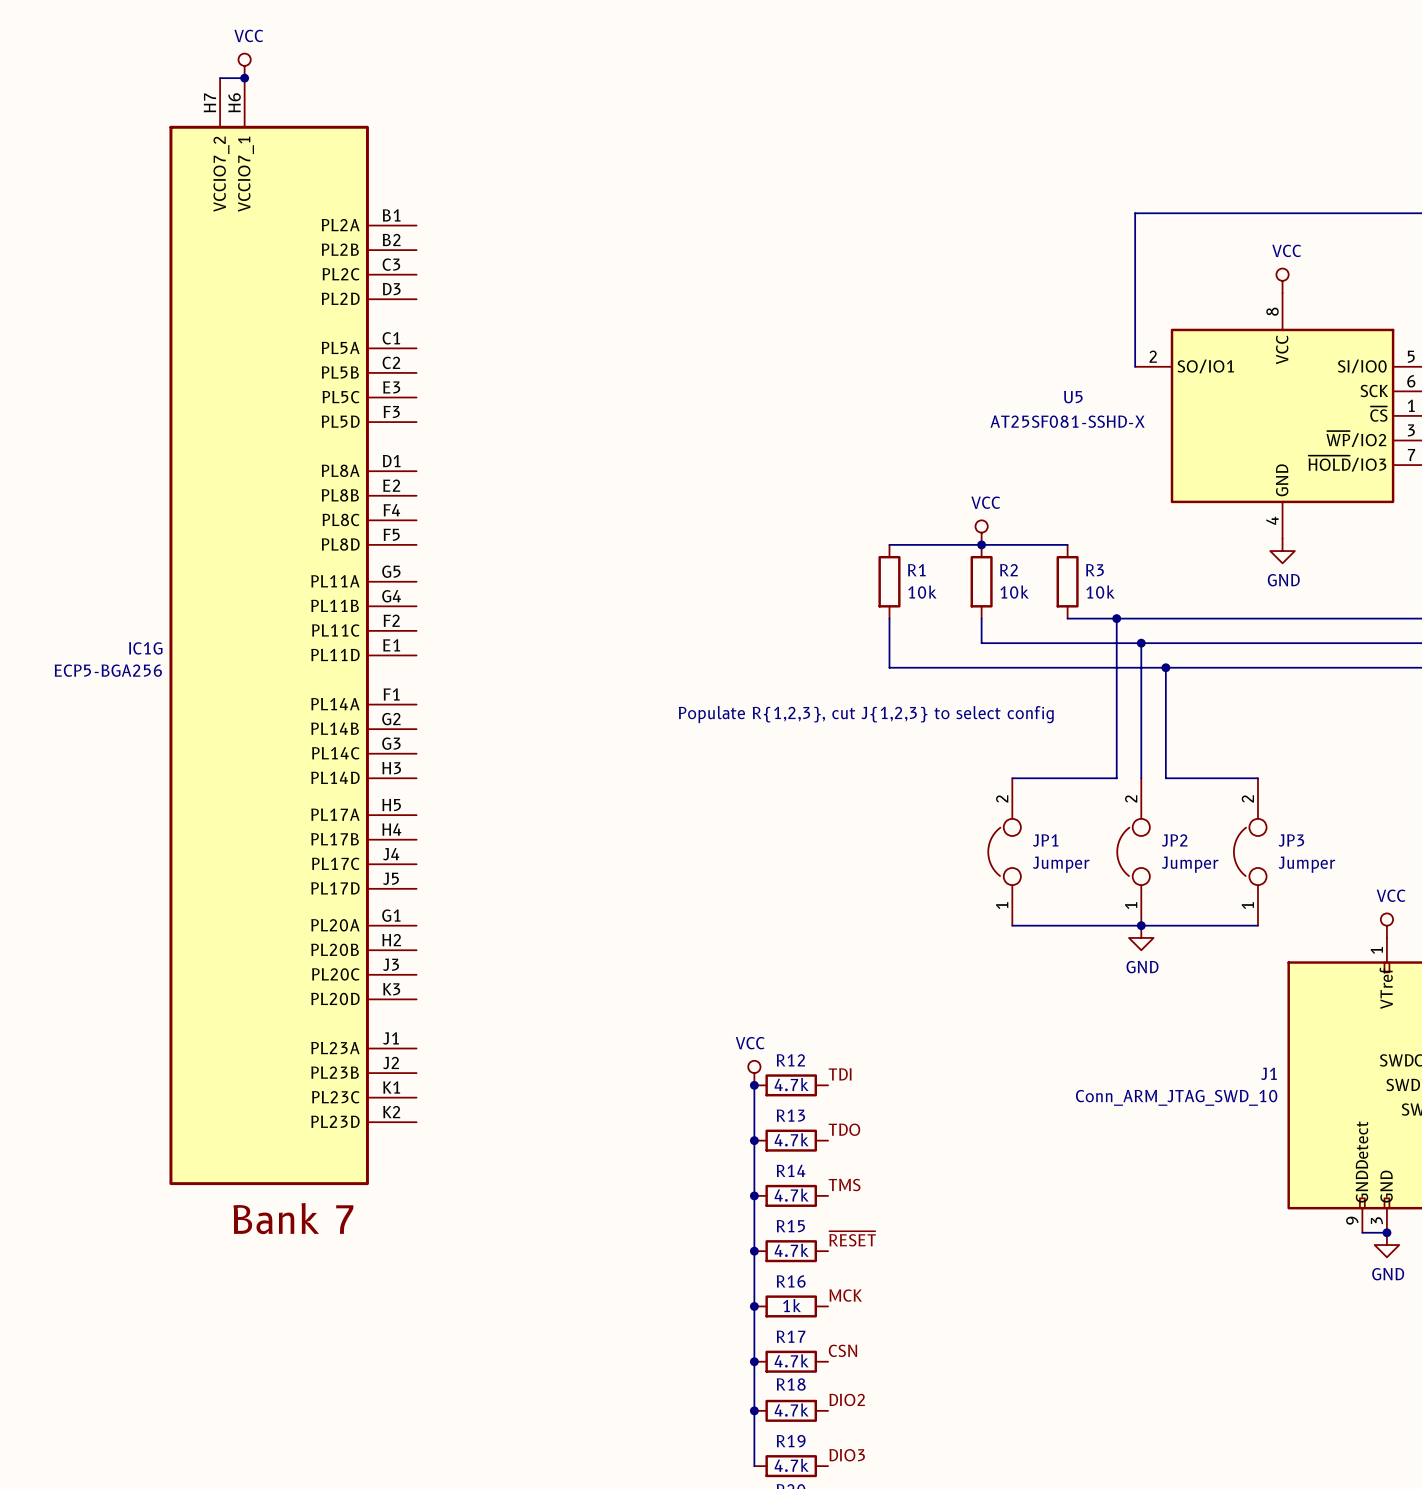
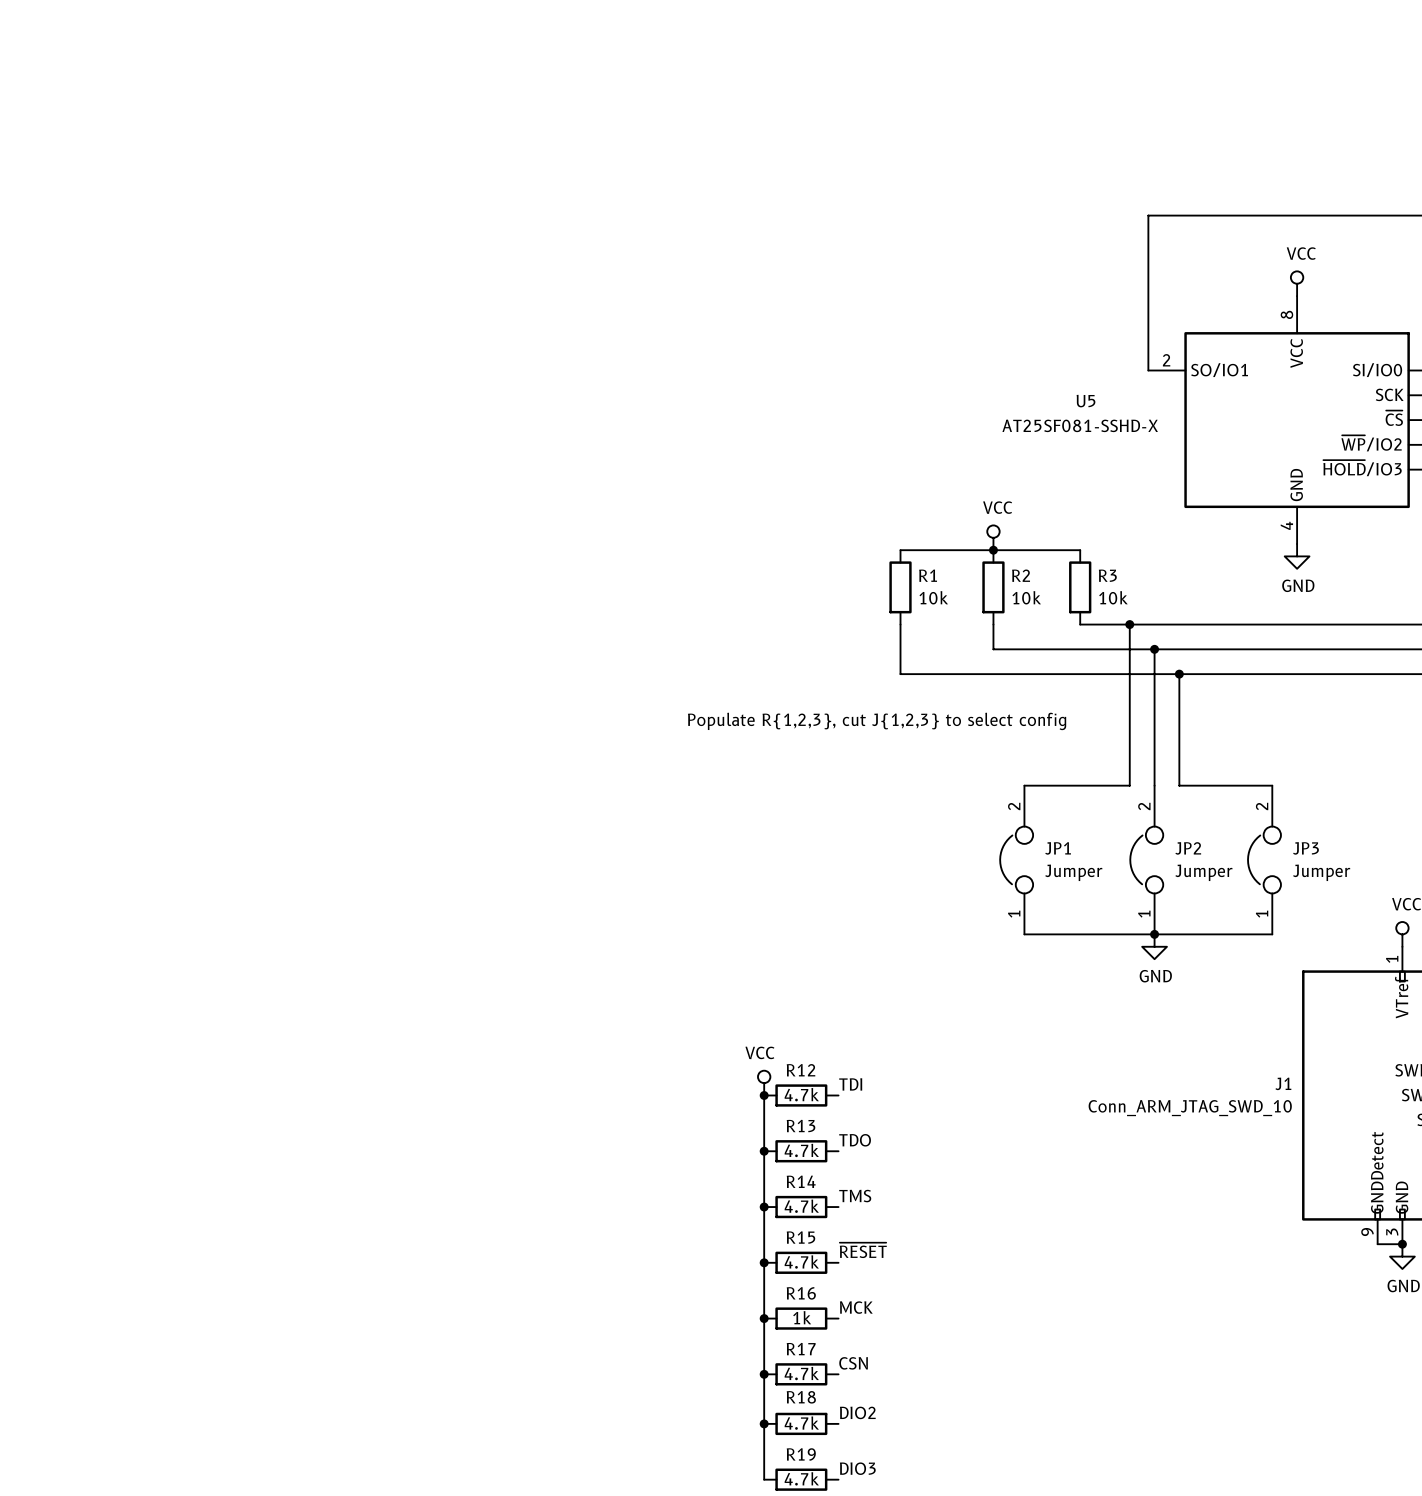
power symbol: VCC (244, 65) -> none
wire: (220, 78) (244, 78) -> none
junction: (244, 78) -> none
IC1G: ECP5-BGA256 (293, 631) -> none

